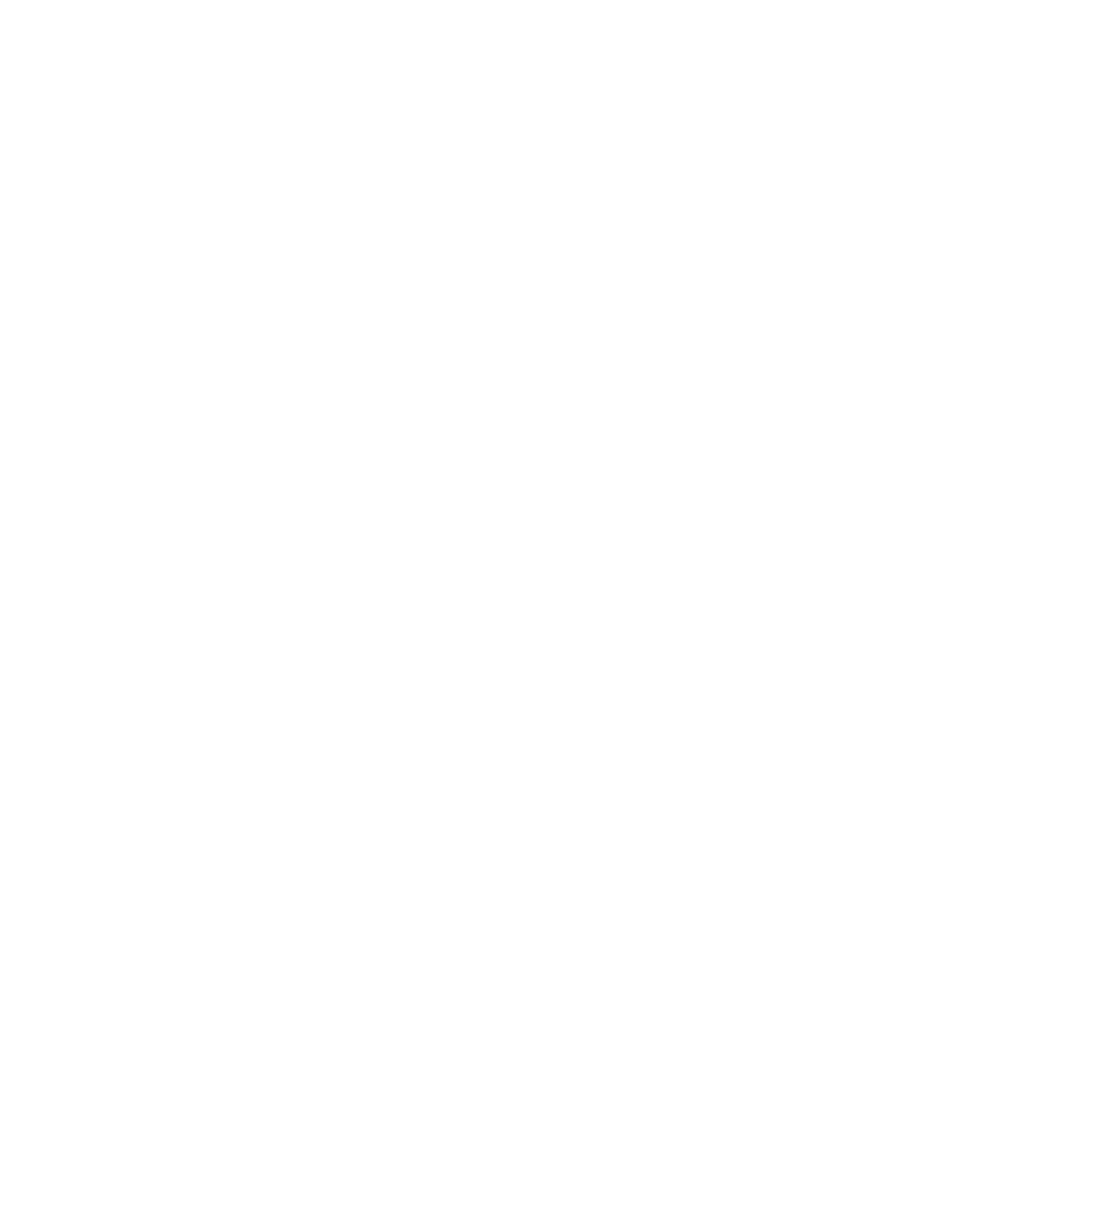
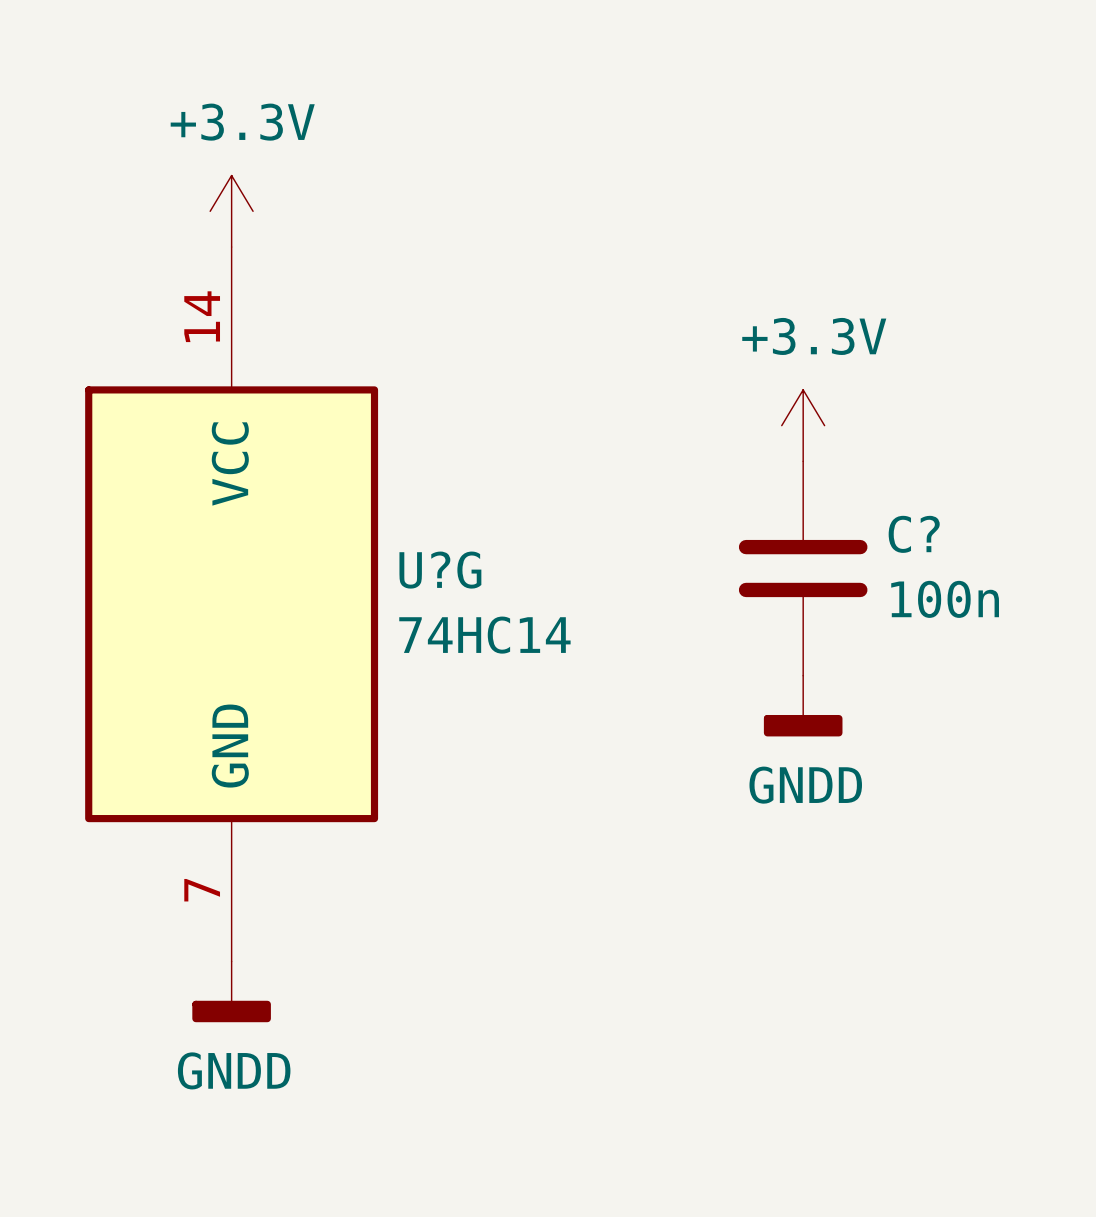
power symbol: none -> +3.3V (231, 211)
power symbol: none -> +3.3V (803, 425)
C?: none -> 100n (803, 568)
U?G: none -> 74HC14 (231, 604)
power symbol: none -> GNDD (803, 706)
power symbol: none -> GNDD (231, 991)

